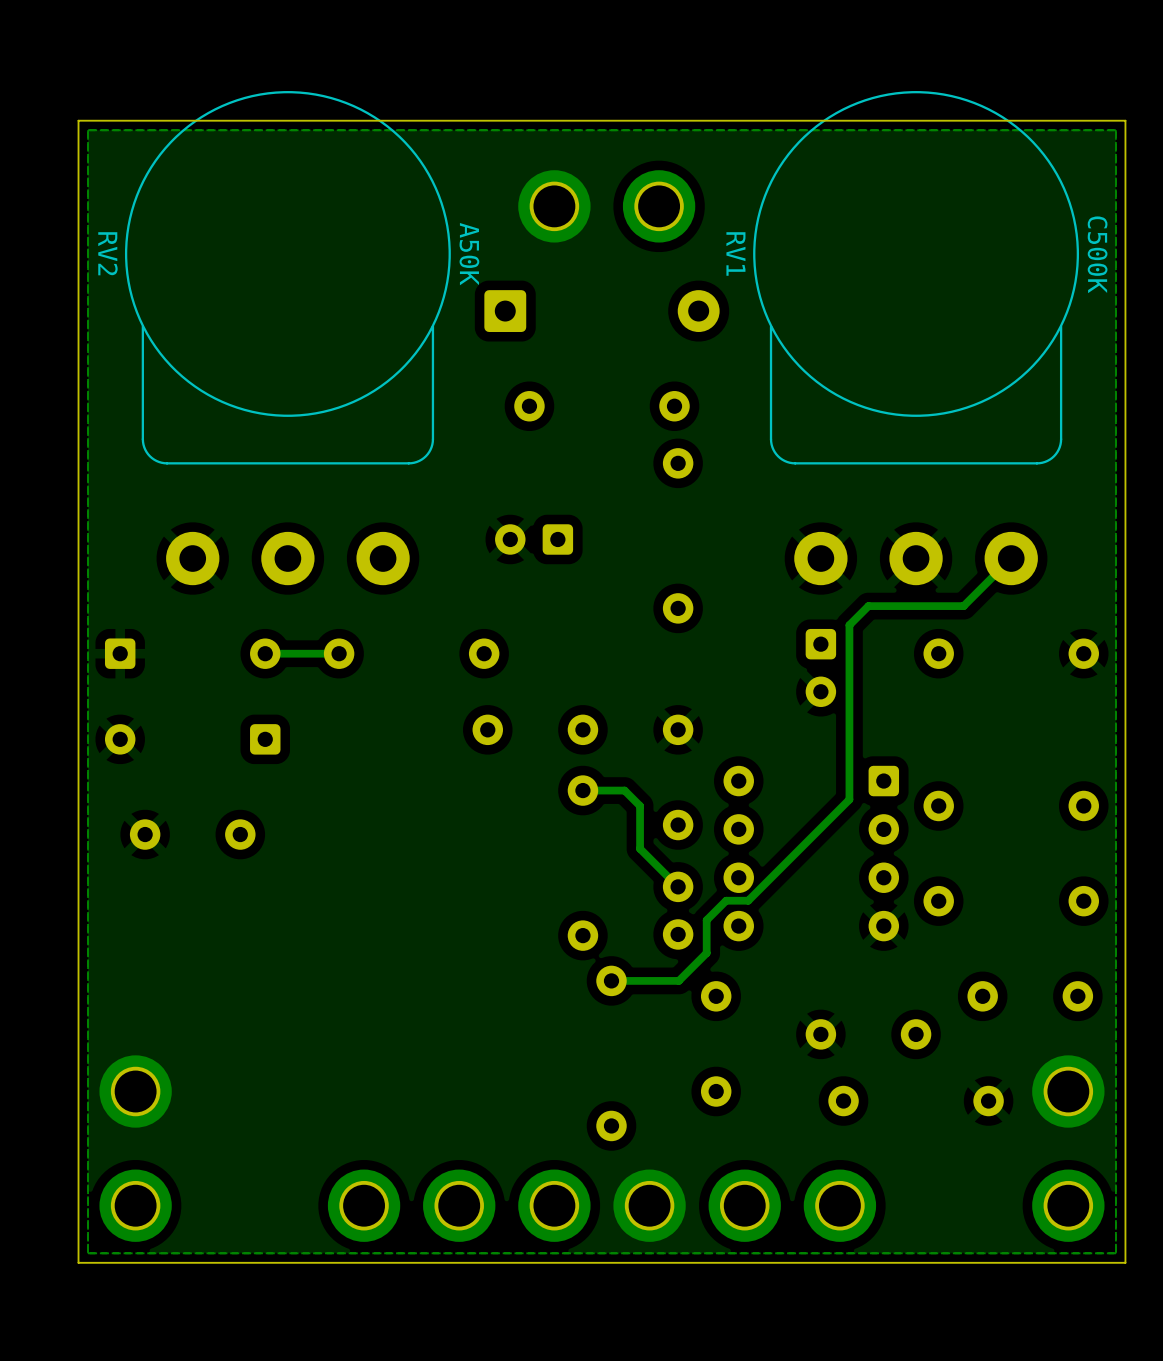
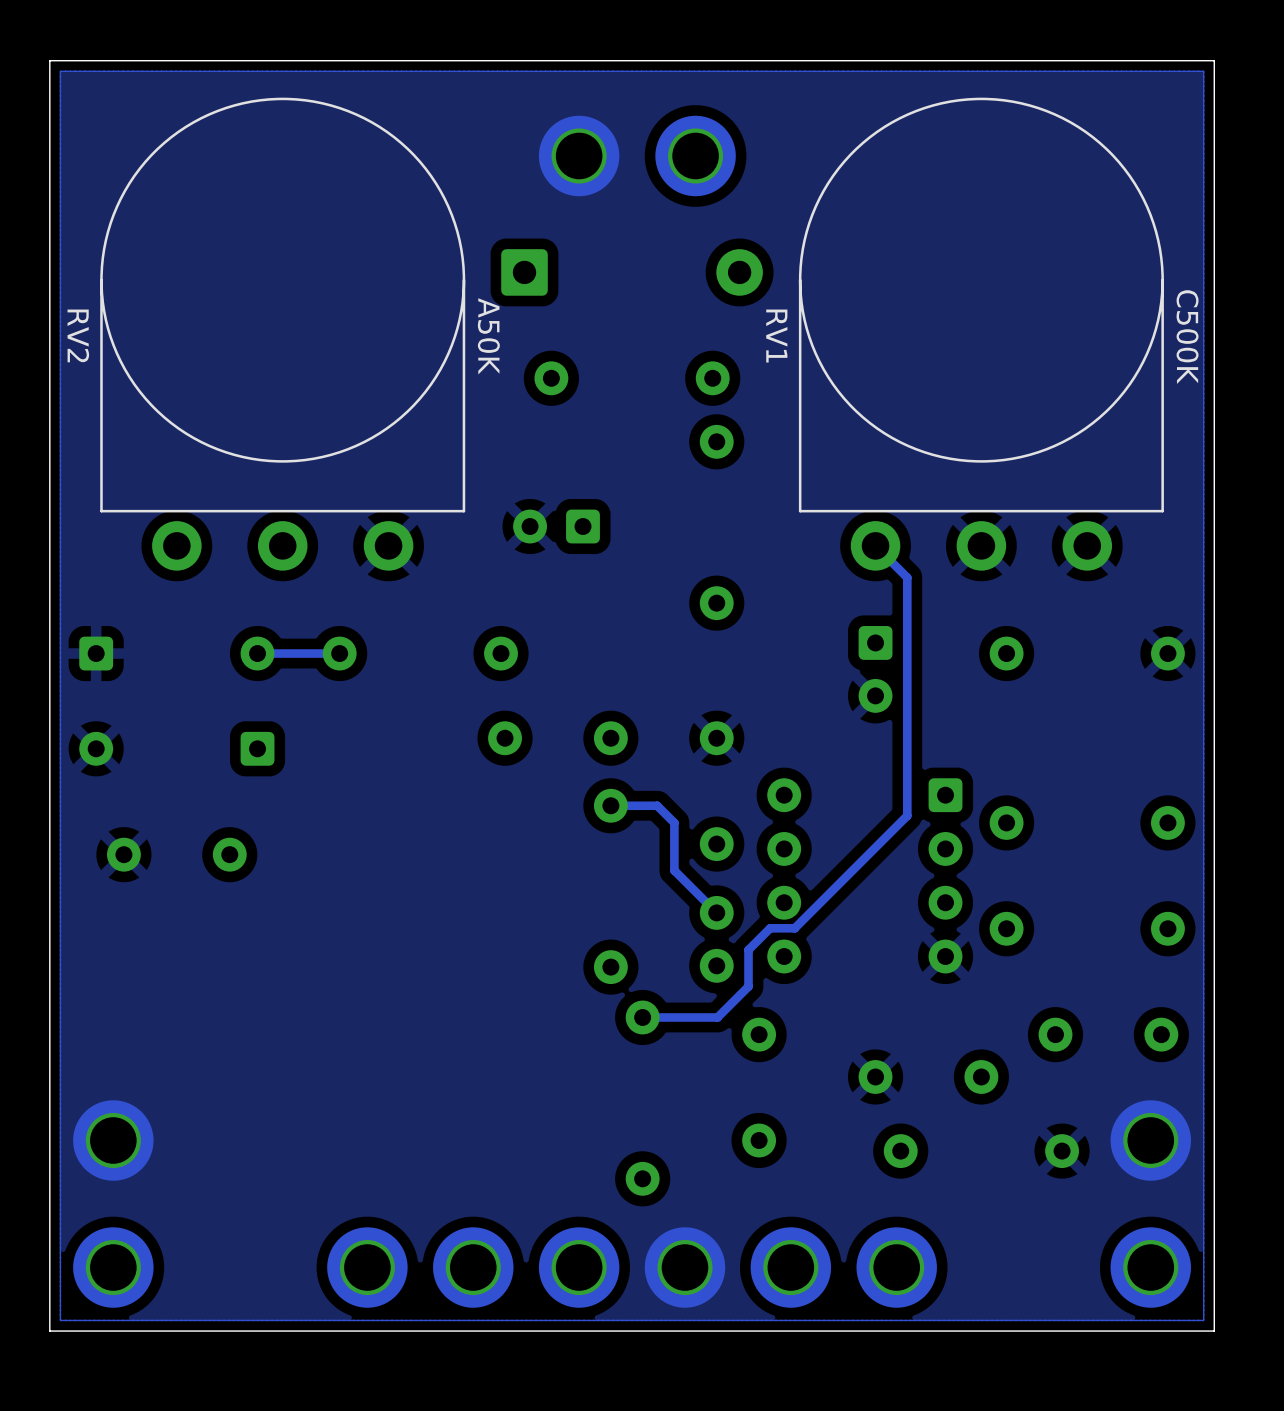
RV2 footprint: [124, 91, 451, 586] -> [100, 97, 466, 571]
RV1 footprint: [753, 91, 1080, 586] -> [798, 97, 1164, 571]
RV2 name position: RV2 (107, 253) -> RV2 (78, 335)
RV1 name position: RV1 (735, 253) -> RV1 (776, 336)
RV2 value position: A50K (469, 254) -> A50K (488, 336)
RV1 value position: C500K (1097, 254) -> C500K (1187, 337)
track: (1011, 558) (963, 606) (868, 606) (849, 625) -> (875, 545) (907, 577) (907, 621)

